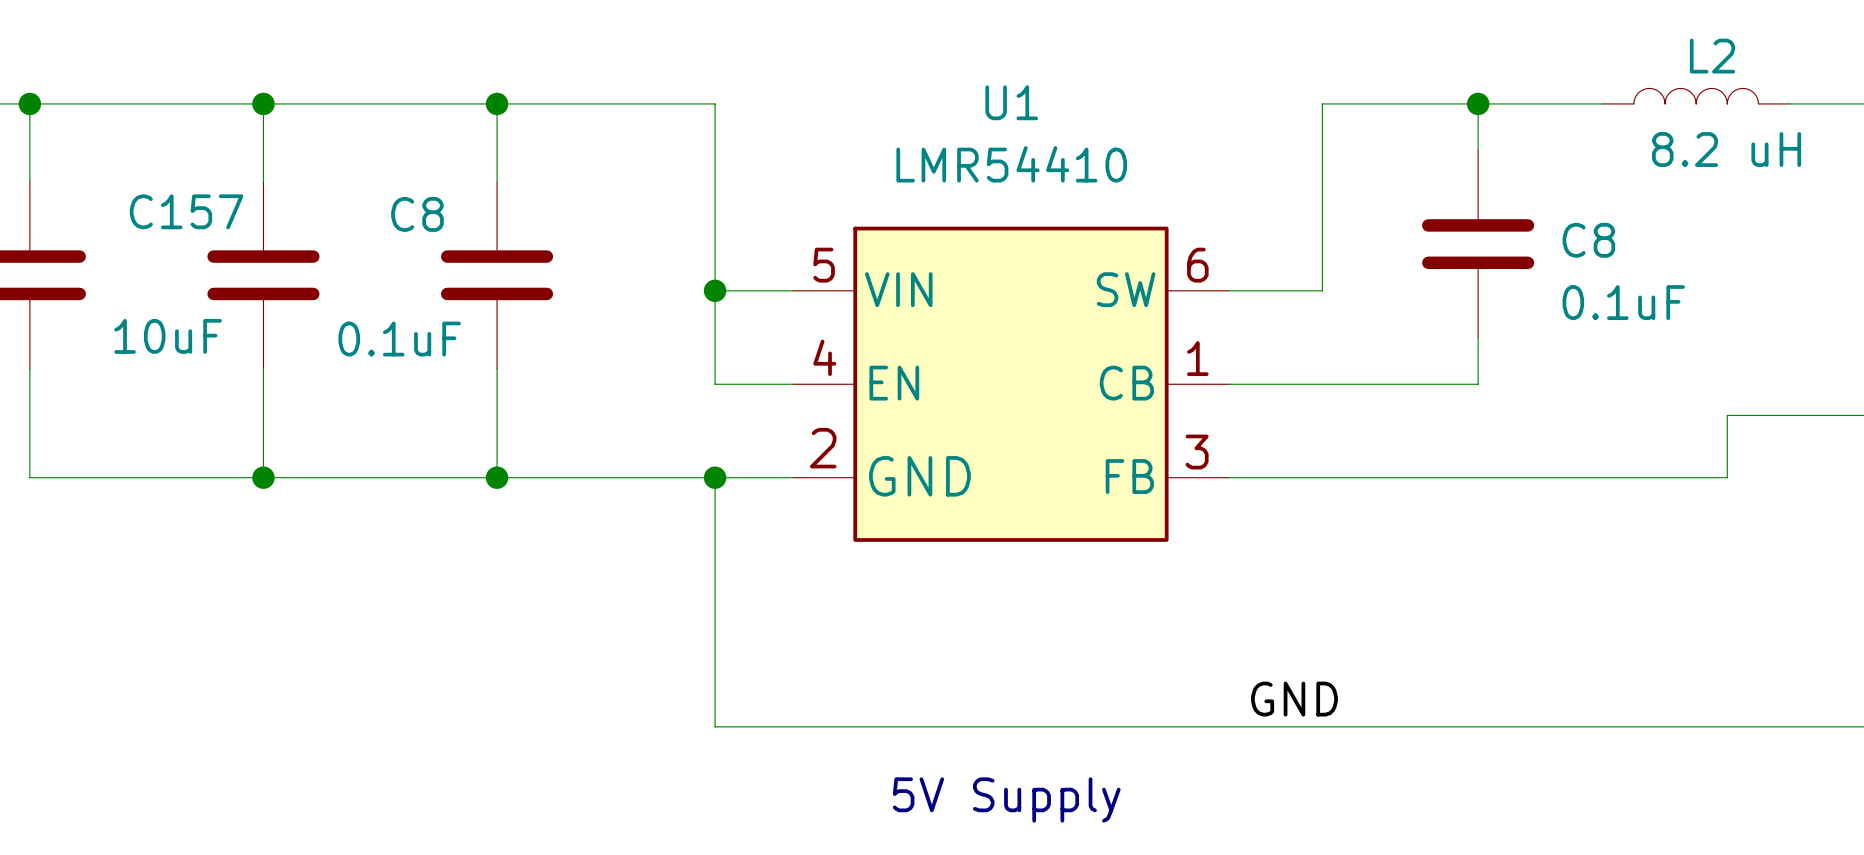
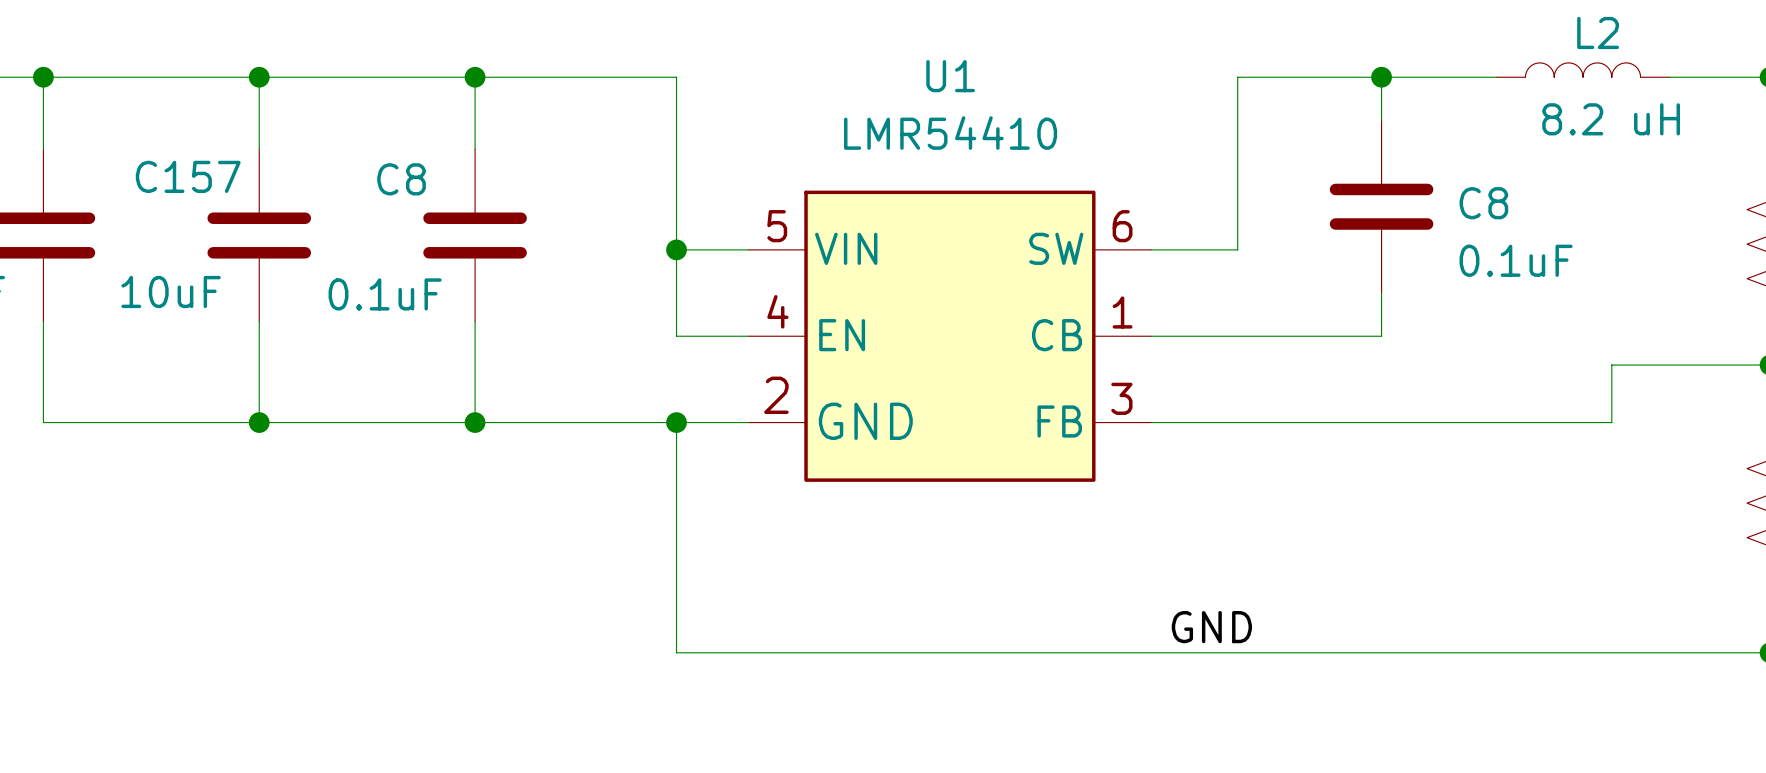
text: 5V Supply (1006, 799) -> none

